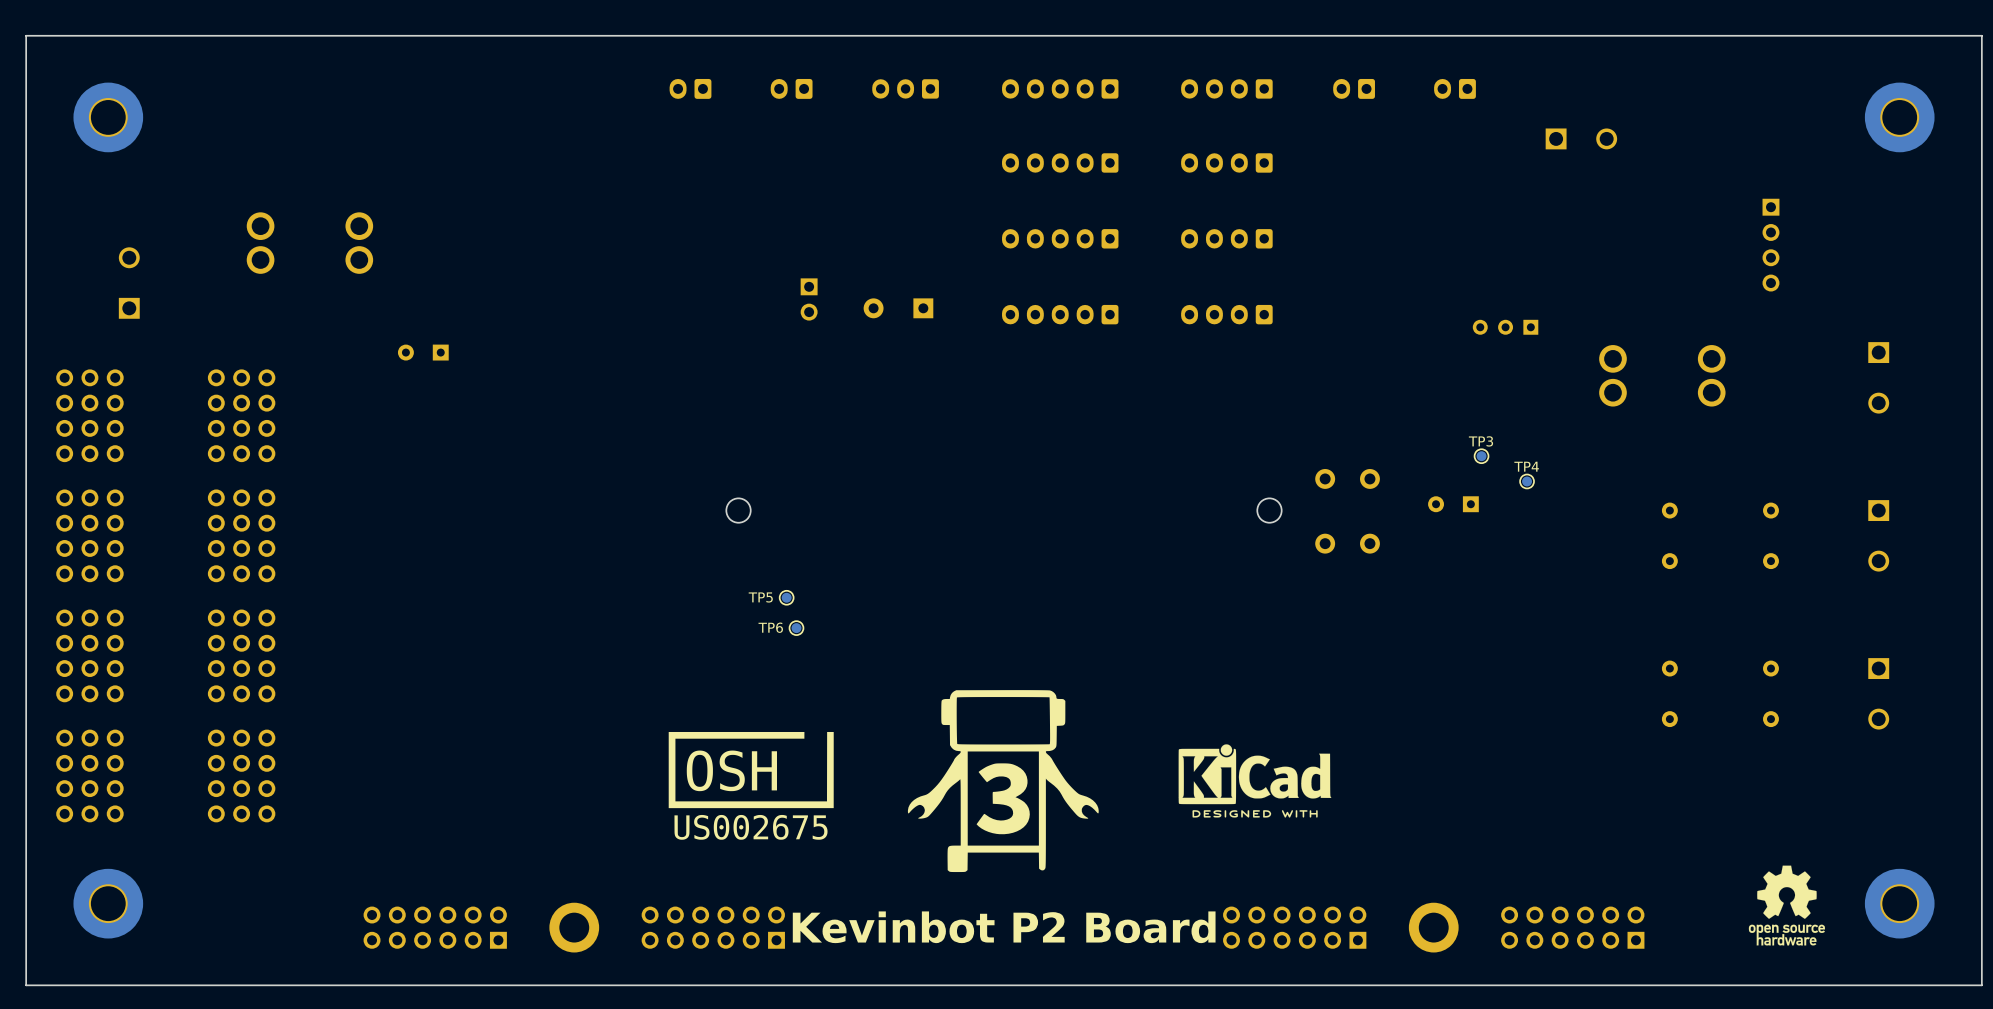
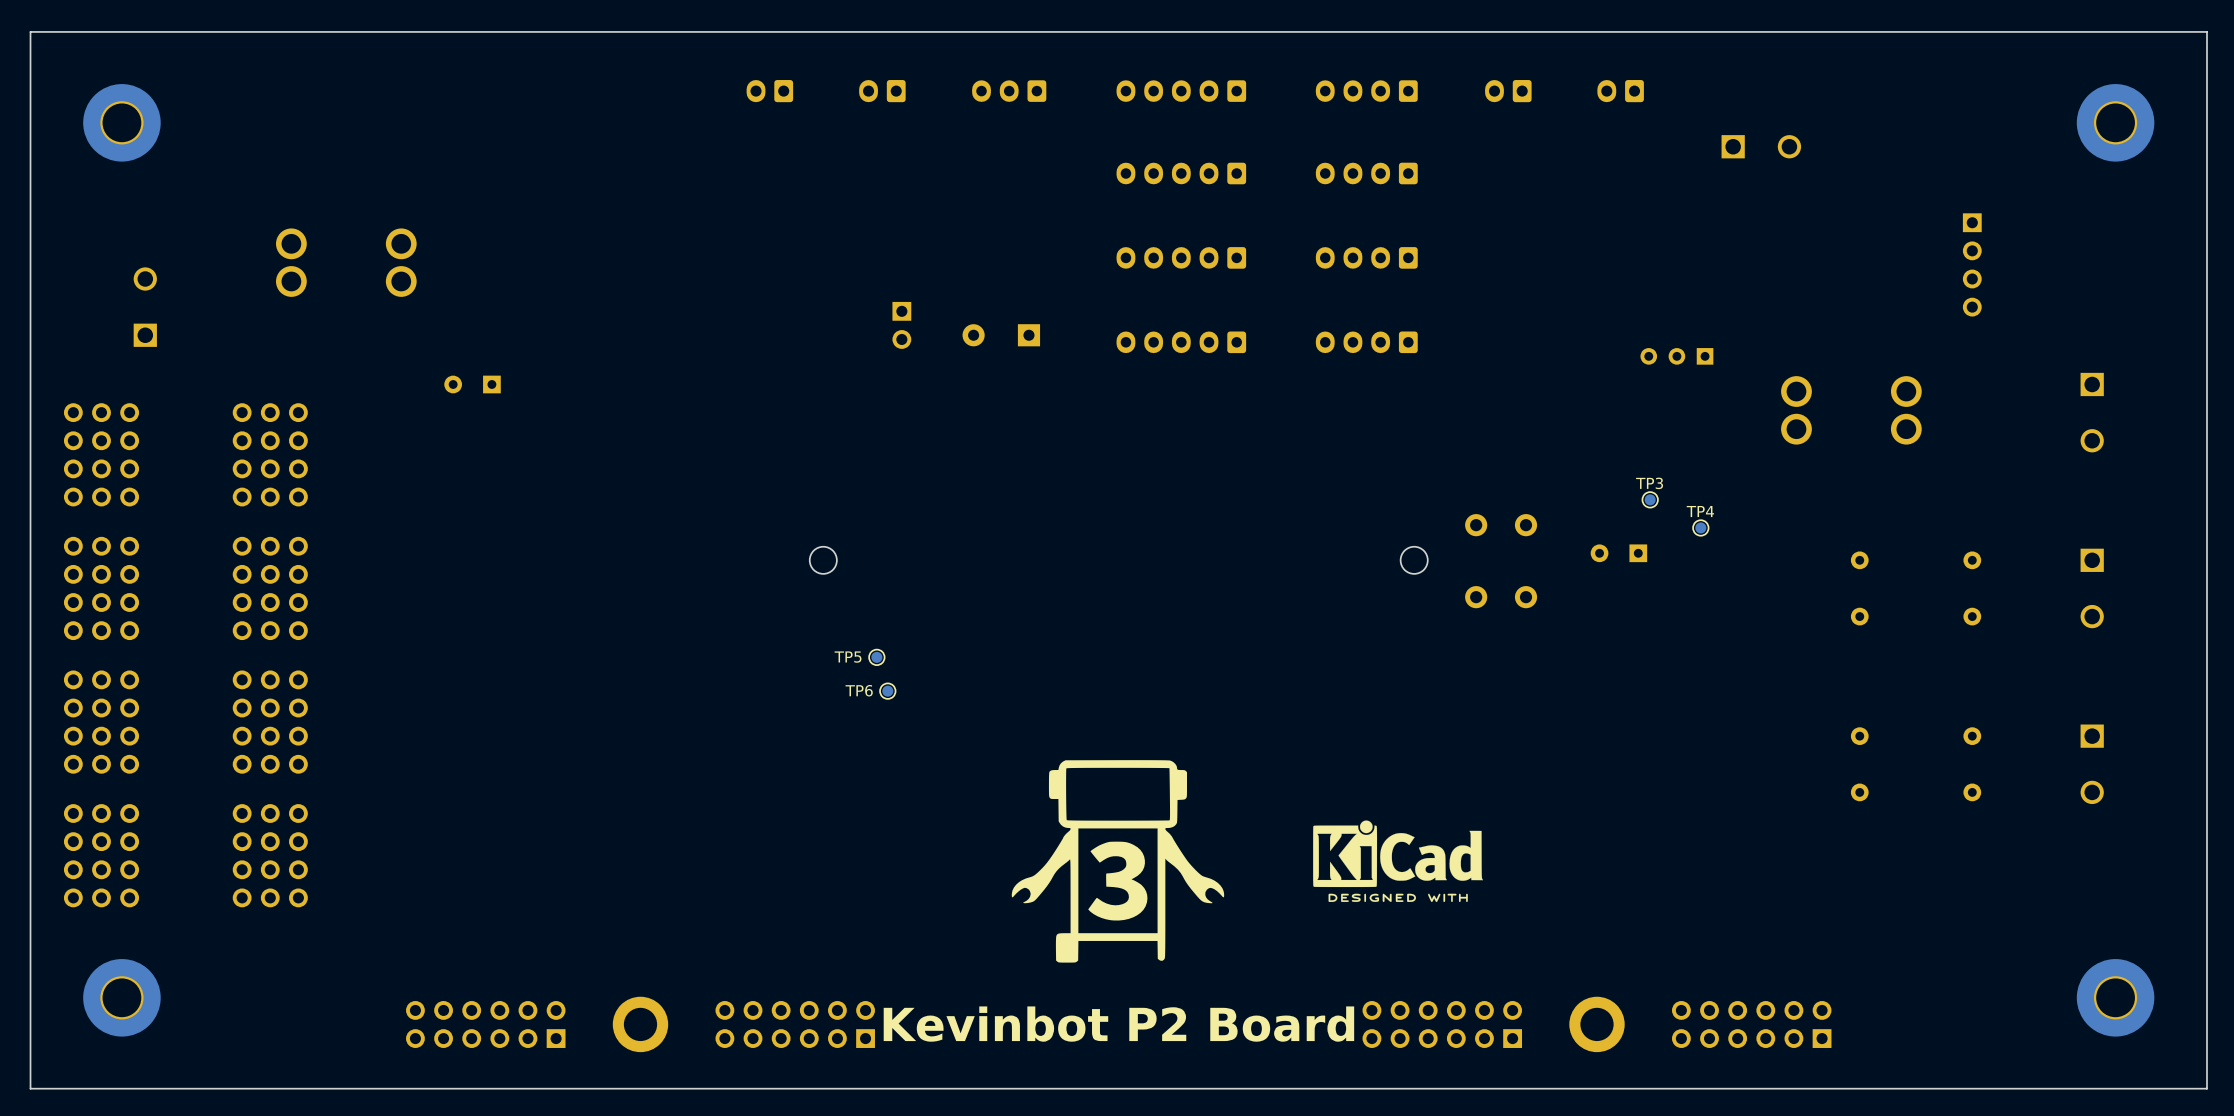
drawing: [668, 731, 834, 840] -> none
drawing: [1748, 865, 1826, 946] -> none

